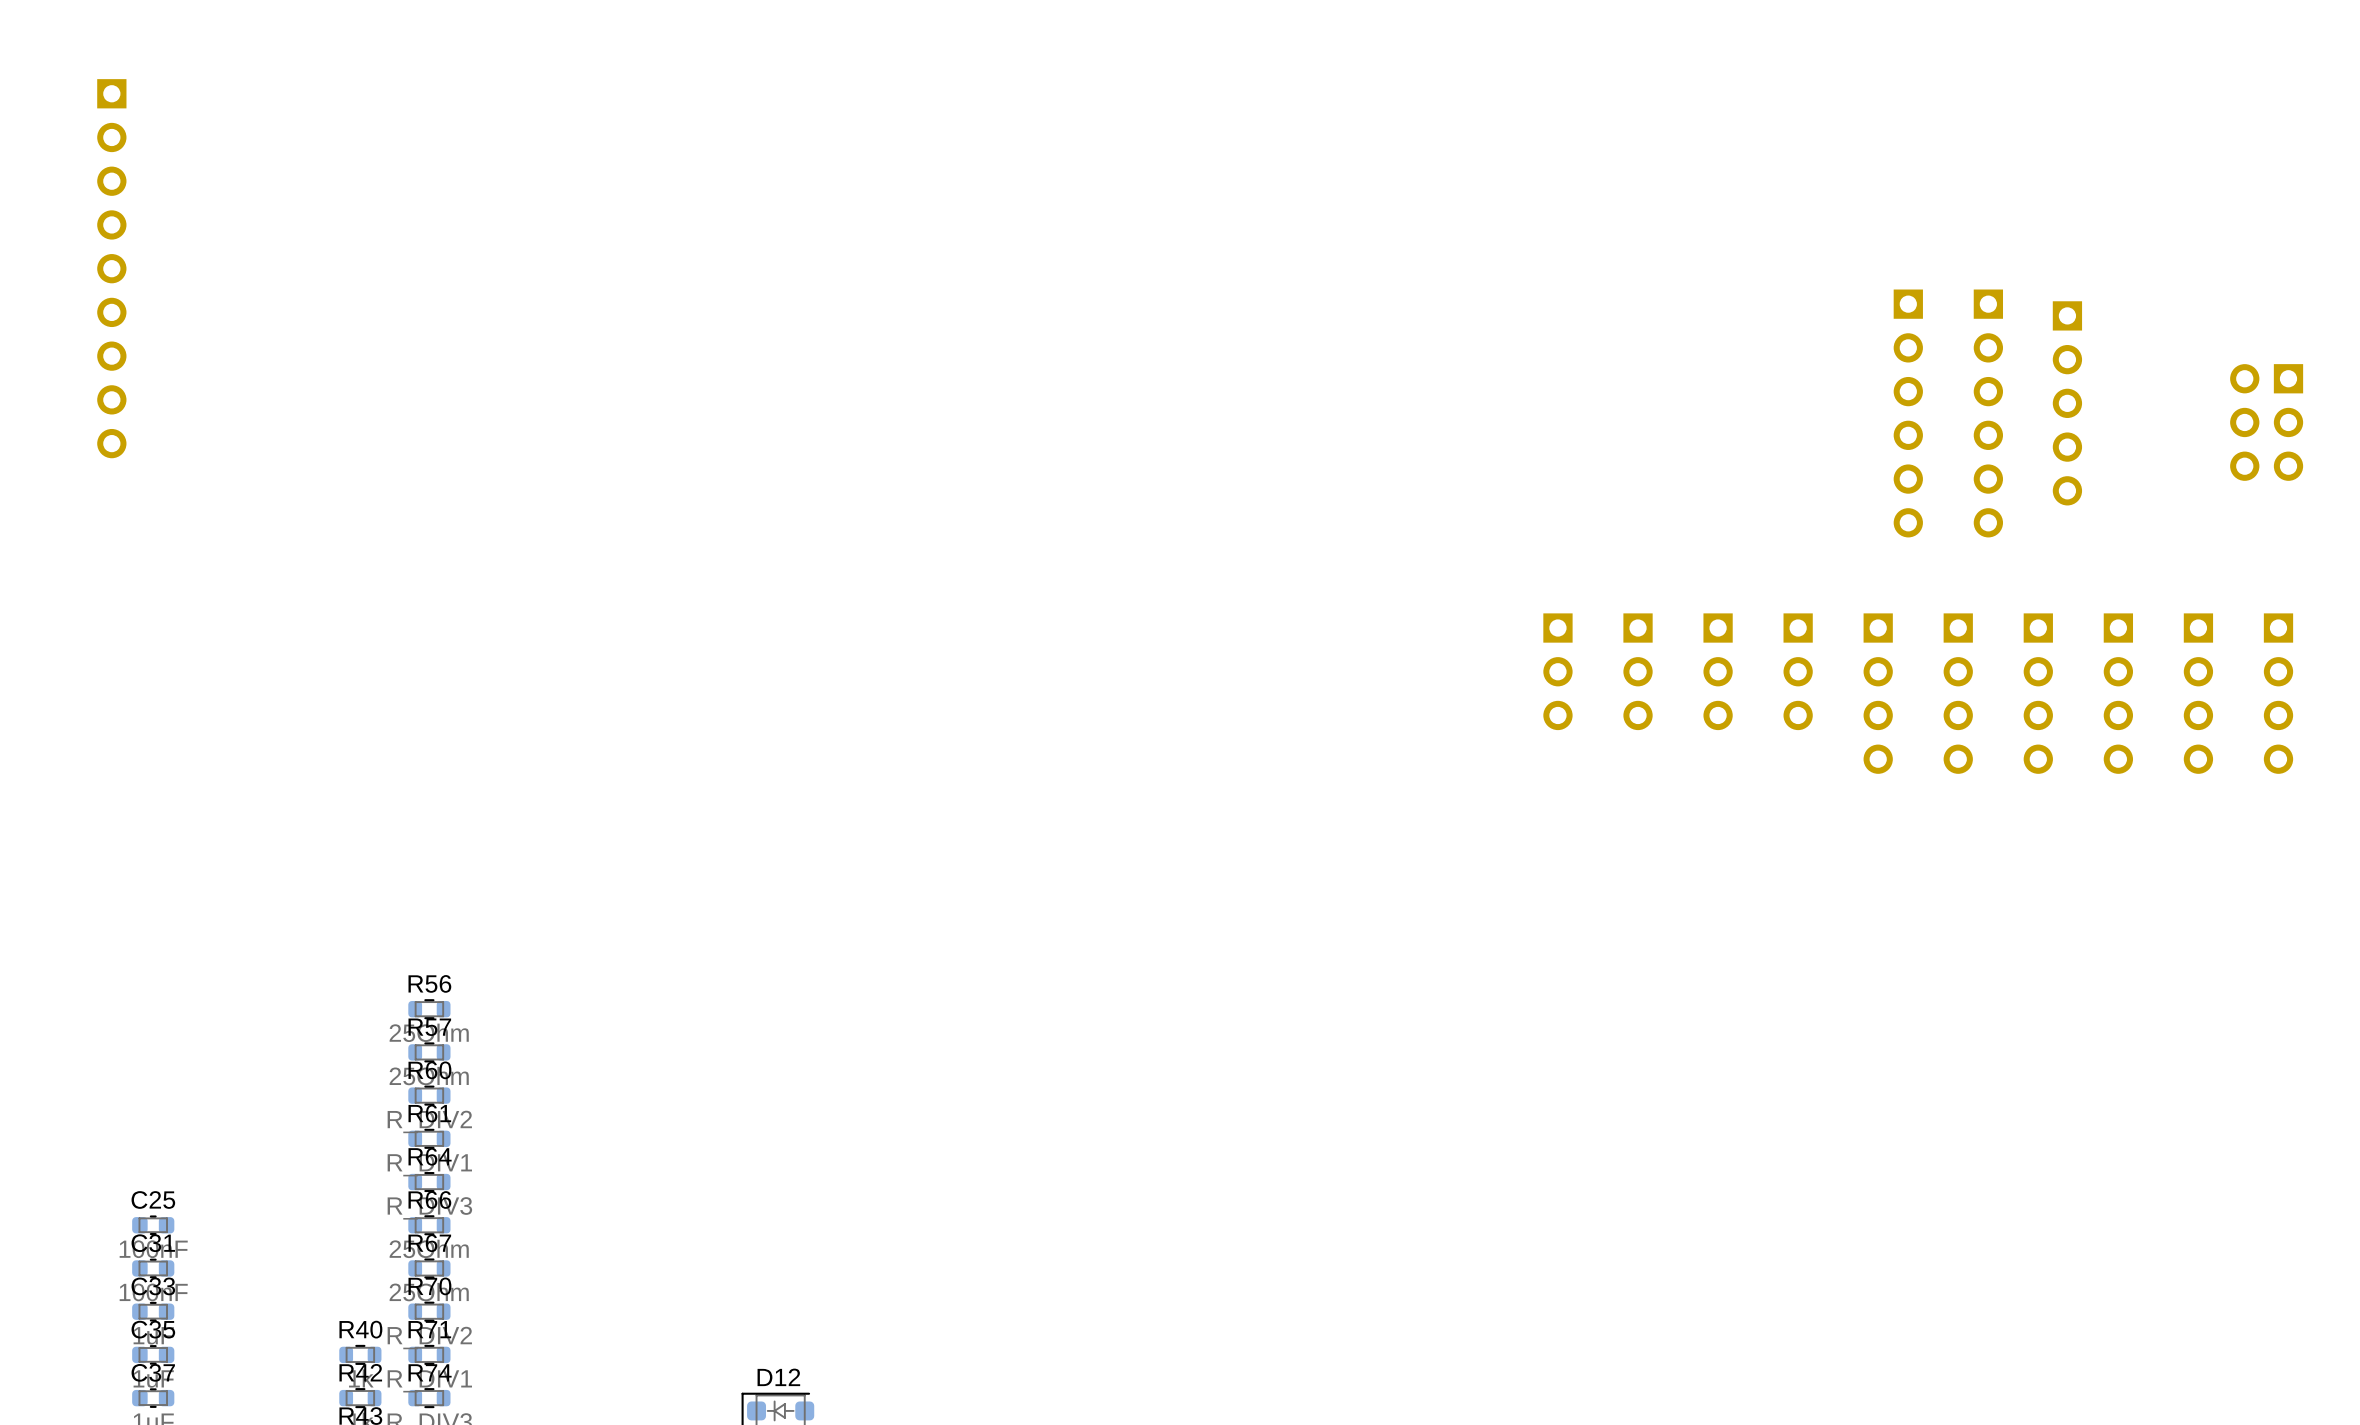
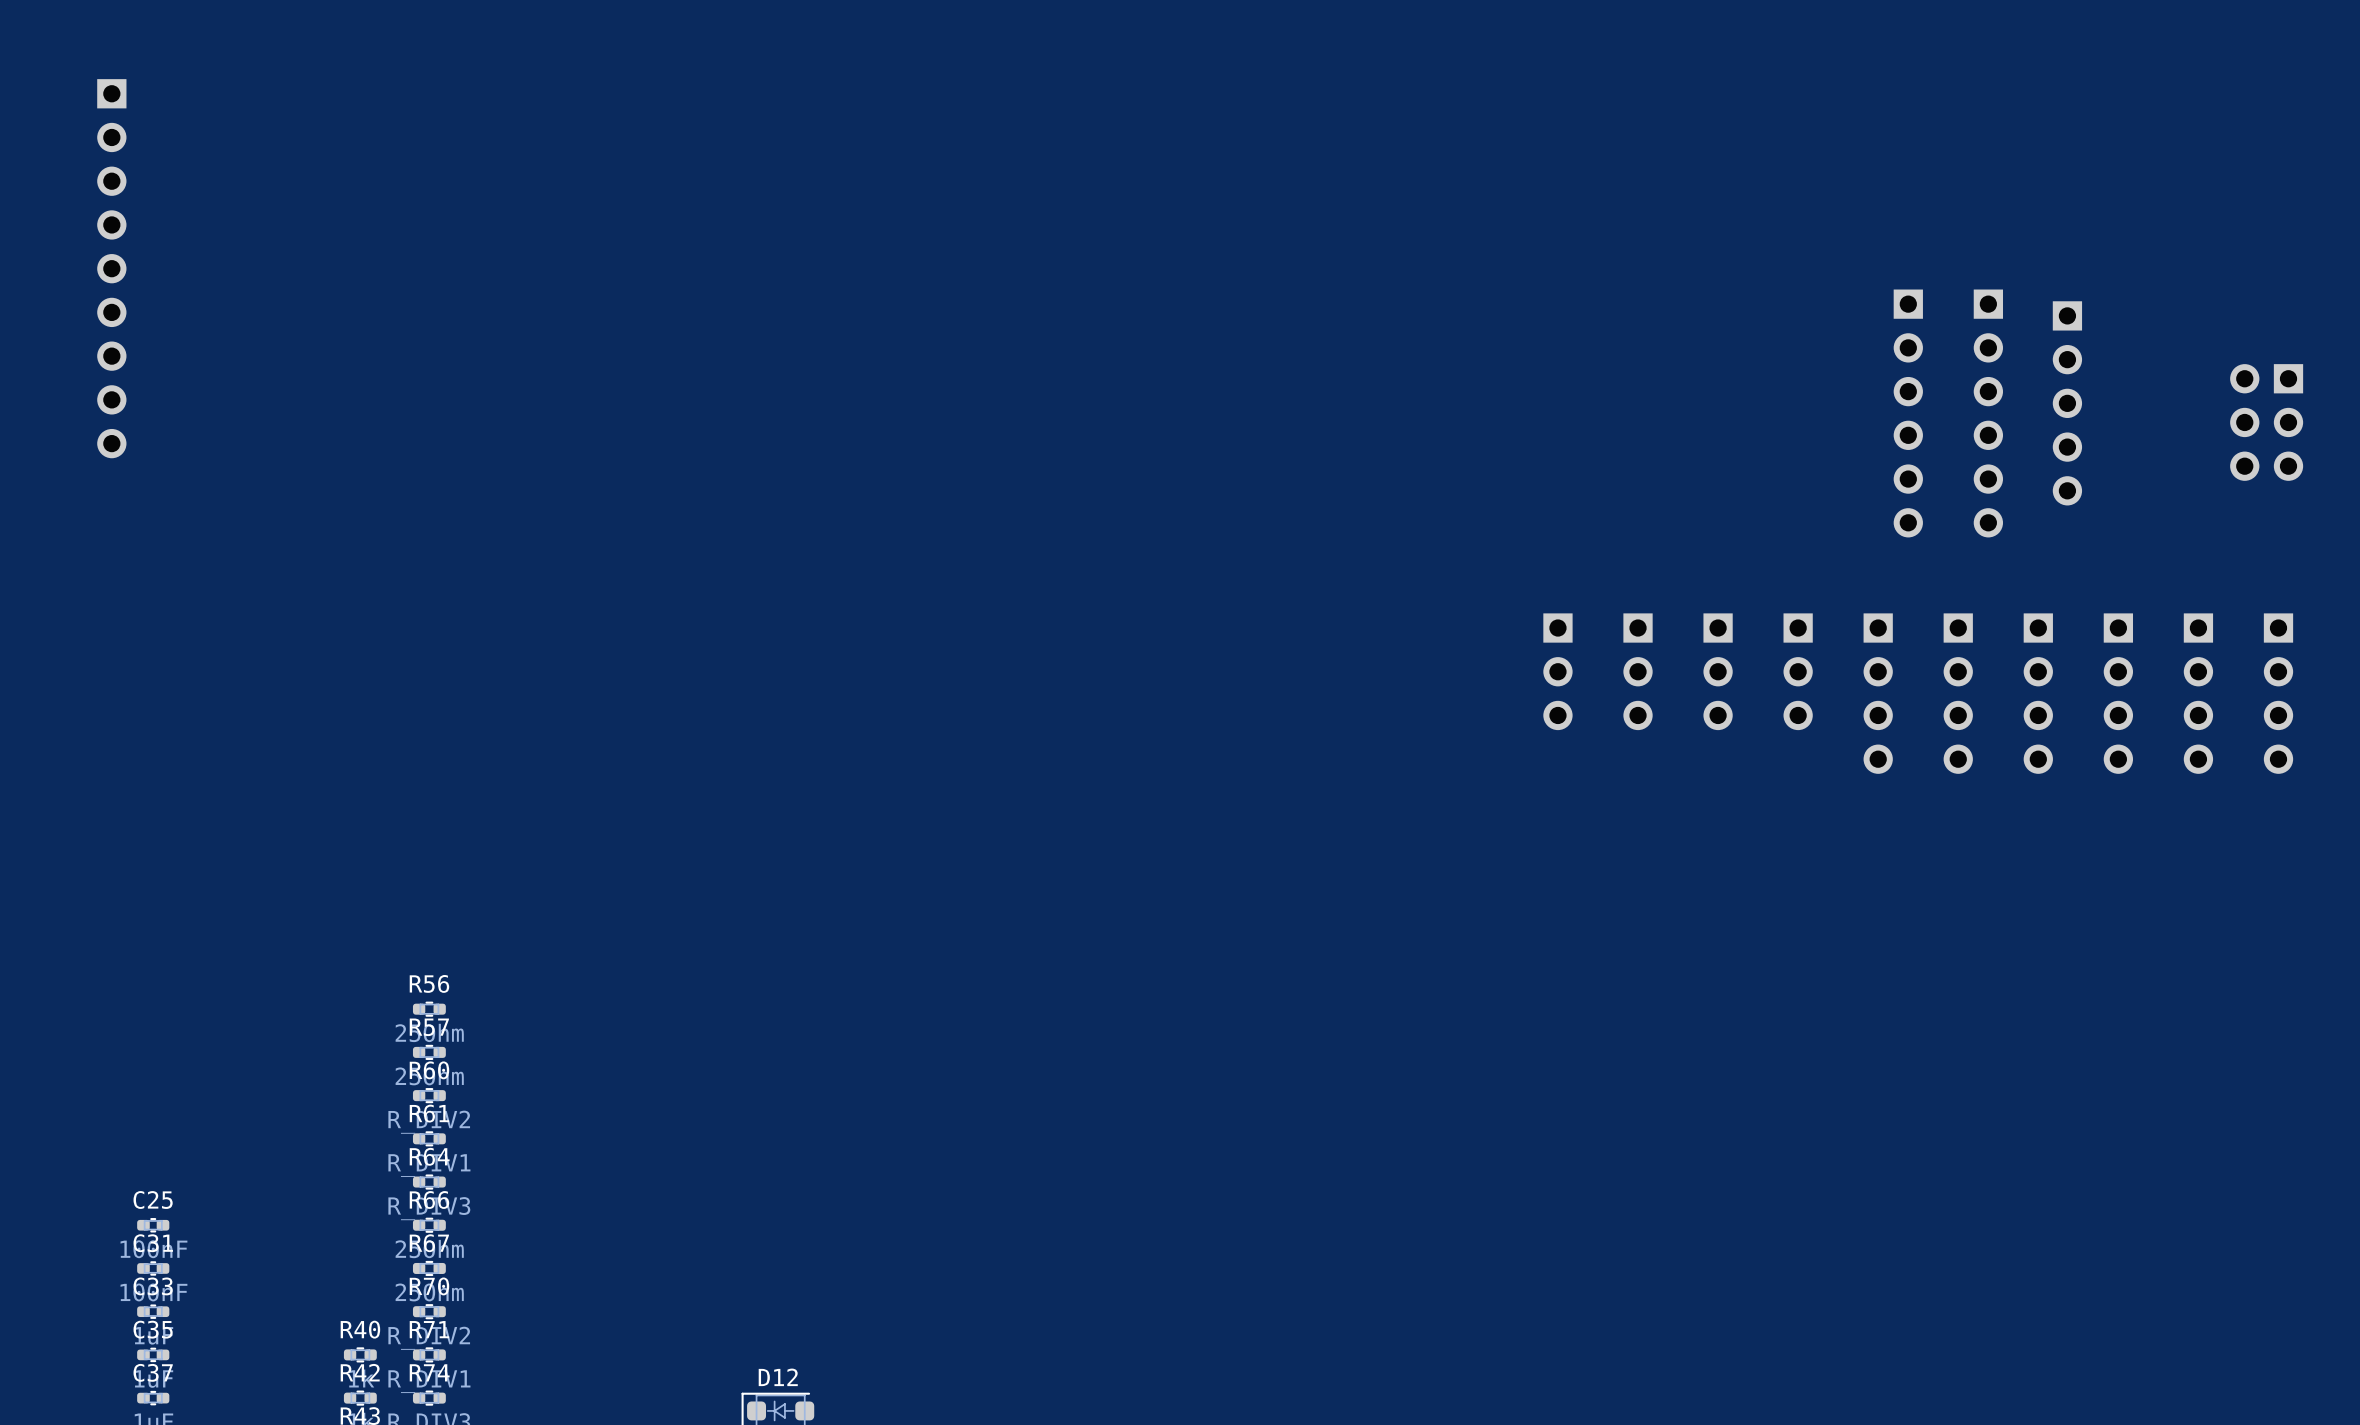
R56 footprint: [408, 999, 451, 1020] -> [412, 1001, 446, 1017]
R57 footprint: [408, 1042, 451, 1063] -> [412, 1044, 446, 1060]
R60 footprint: [408, 1085, 451, 1106] -> [412, 1088, 446, 1104]
R61 footprint: [408, 1128, 451, 1149] -> [412, 1131, 446, 1147]
R64 footprint: [408, 1172, 451, 1193] -> [412, 1174, 446, 1190]
C25 footprint: [132, 1215, 175, 1236] -> [137, 1218, 170, 1233]
R66 footprint: [408, 1215, 451, 1236] -> [412, 1217, 446, 1233]
C31 footprint: [132, 1258, 175, 1279] -> [137, 1261, 170, 1276]
R67 footprint: [408, 1258, 451, 1279] -> [412, 1260, 446, 1277]
C33 footprint: [132, 1301, 175, 1322] -> [137, 1304, 170, 1319]
R70 footprint: [408, 1301, 451, 1322] -> [412, 1304, 446, 1320]
R40 footprint: [339, 1344, 382, 1365] -> [343, 1347, 377, 1363]
R71 footprint: [408, 1344, 451, 1365] -> [412, 1347, 446, 1363]
C35 footprint: [132, 1345, 175, 1365] -> [137, 1347, 170, 1363]
C37 footprint: [132, 1388, 175, 1408] -> [137, 1390, 170, 1406]
R42 footprint: [339, 1388, 382, 1409] -> [343, 1390, 377, 1406]
R74 footprint: [408, 1388, 451, 1409] -> [412, 1390, 446, 1406]

